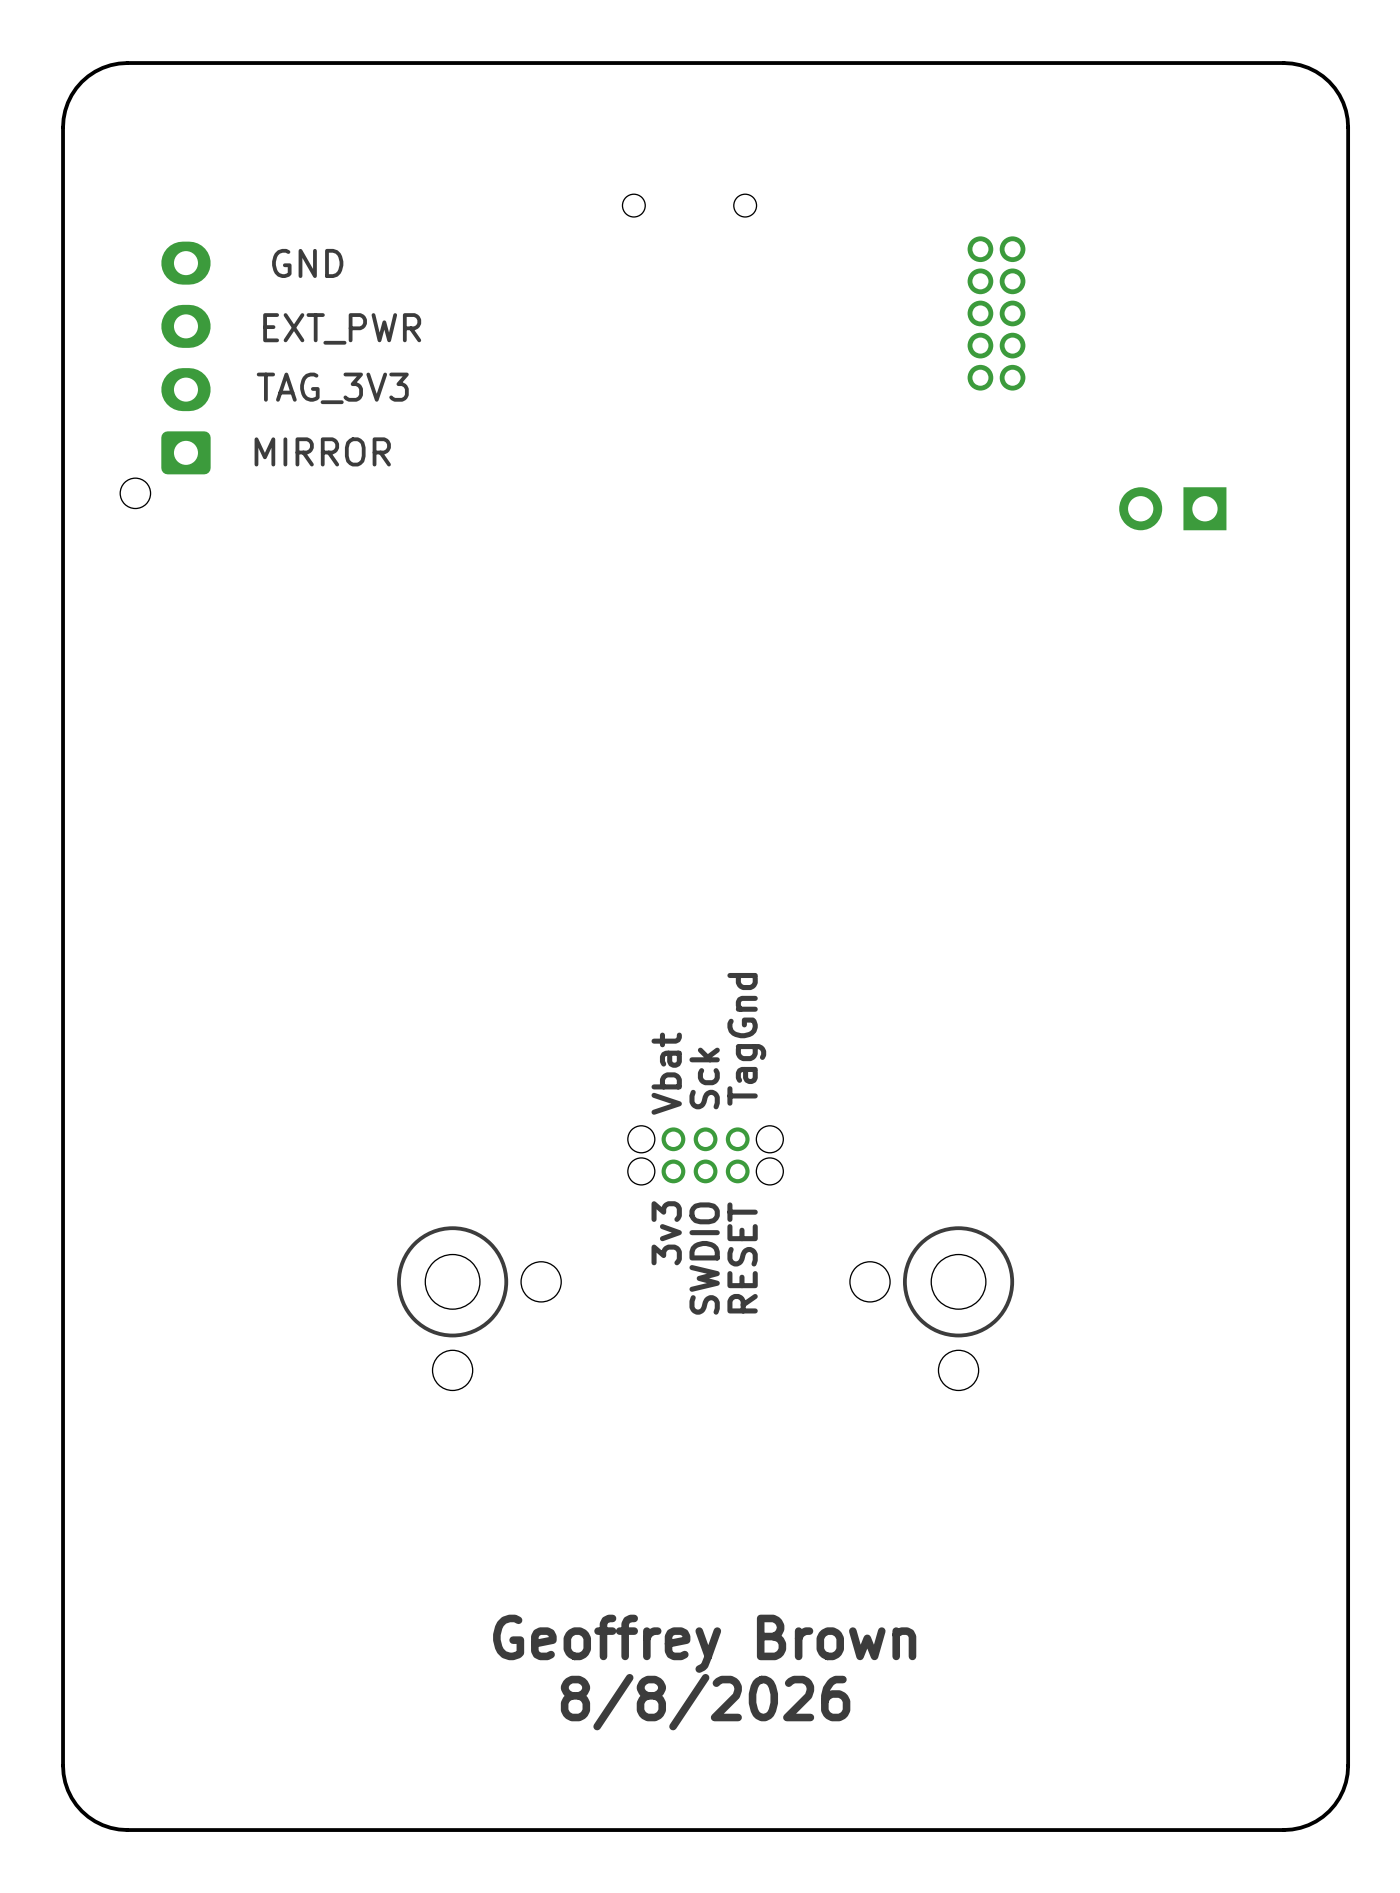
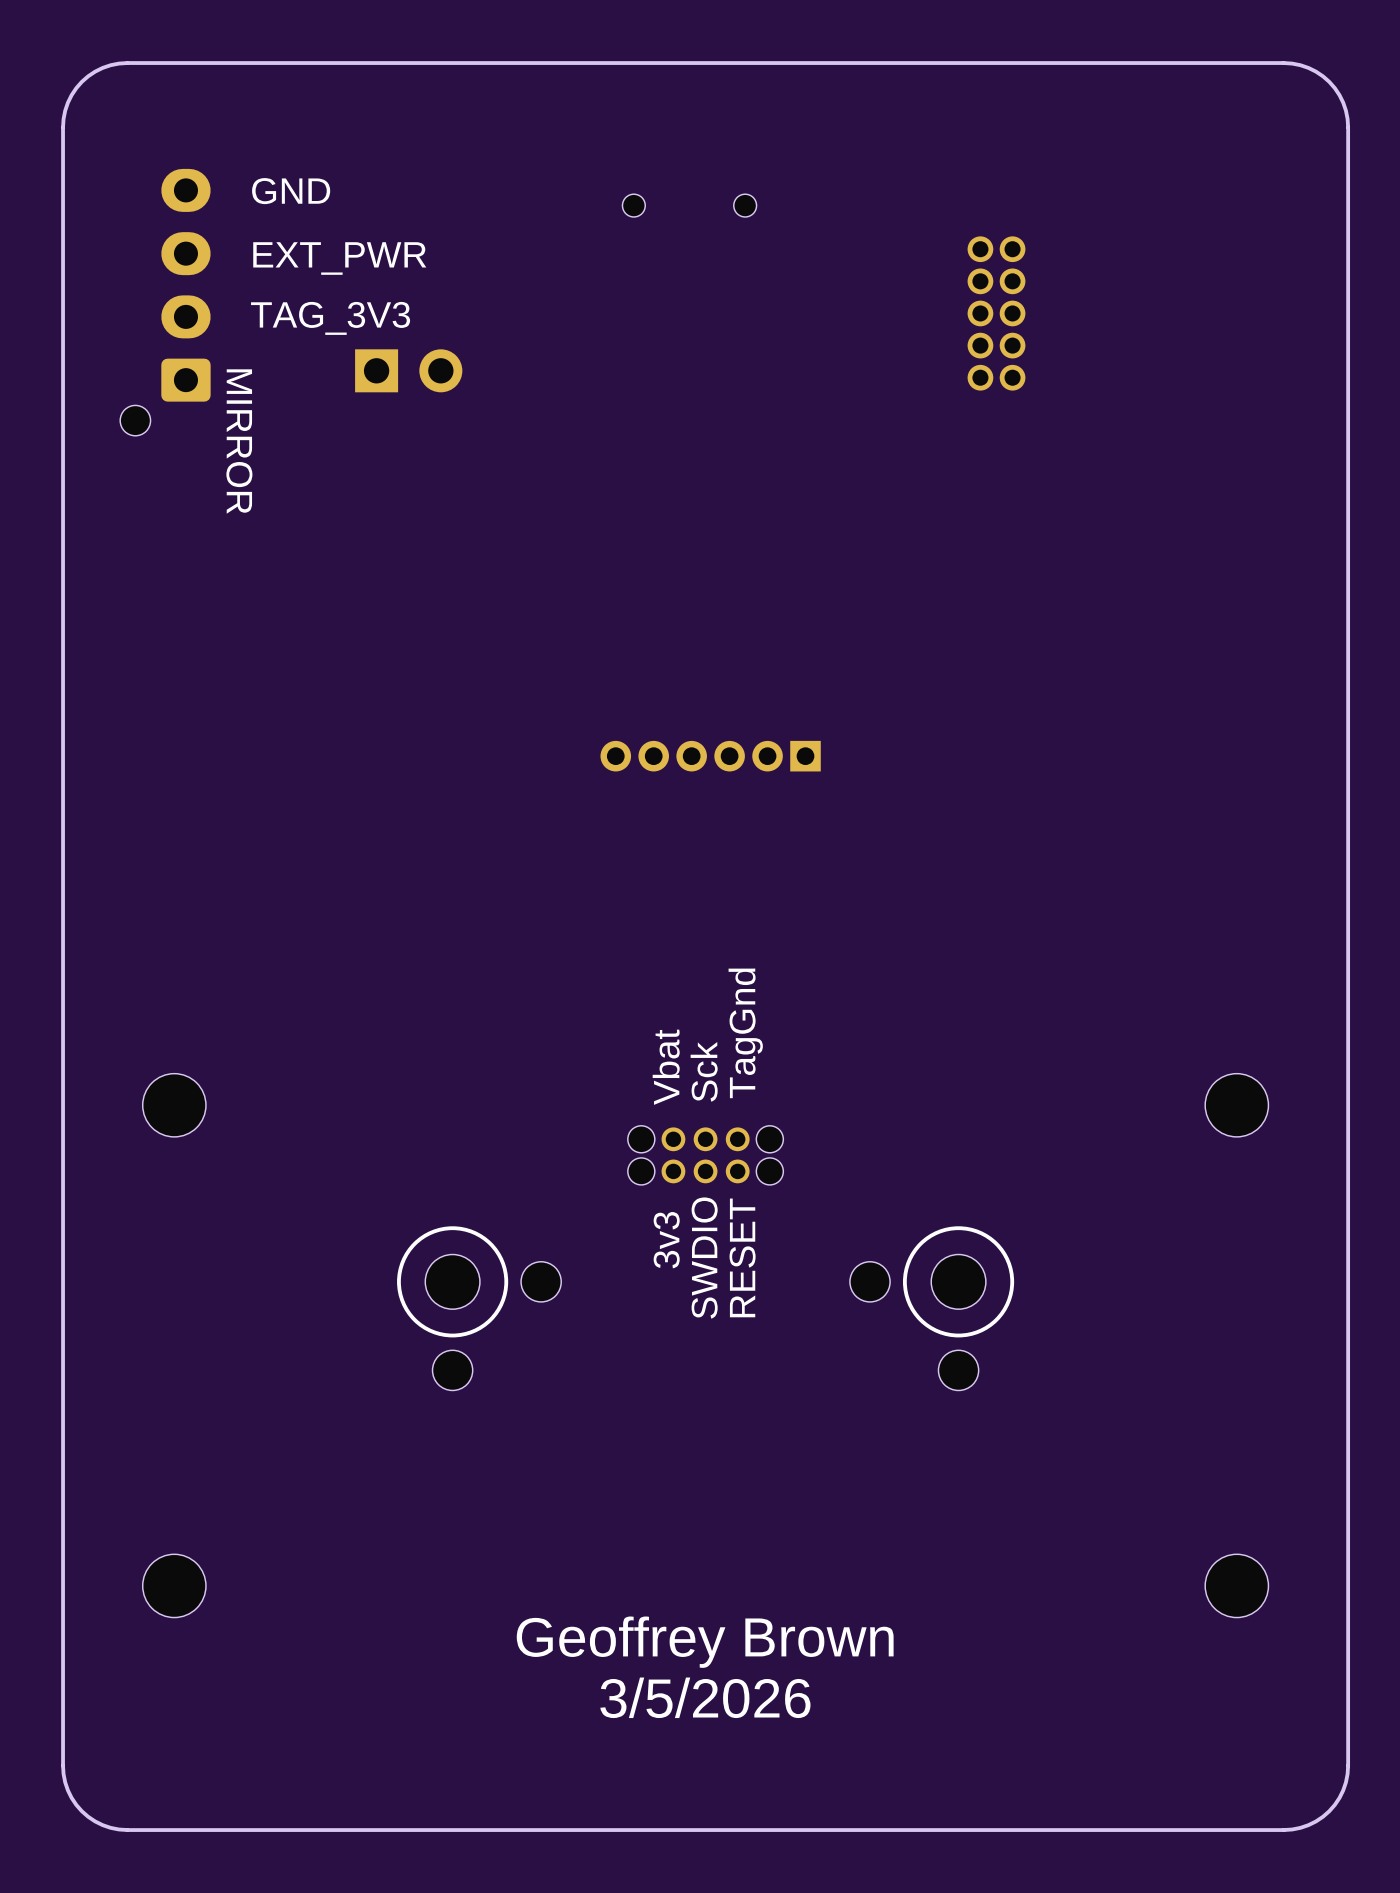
text position: GND (307, 263) -> GND (291, 191)
text position: EXT_PWR (342, 328) -> EXT_PWR (339, 258)
part: none -> (408, 370)
part position: (165, 375) -> (165, 302)
text position: TAG_3V3 (332, 388) -> TAG_3V3 (330, 318)
text rotation: 0° (322, 451) -> 90° clockwise (239, 441)
part: (1172, 508) -> none
part: none -> (710, 756)
part: none -> (174, 1105)
part: none -> (1236, 1105)
part: none -> (174, 1585)
part: none -> (1236, 1585)
text: 8/8/2026 (705, 1702) -> 3/5/2026 (705, 1697)

